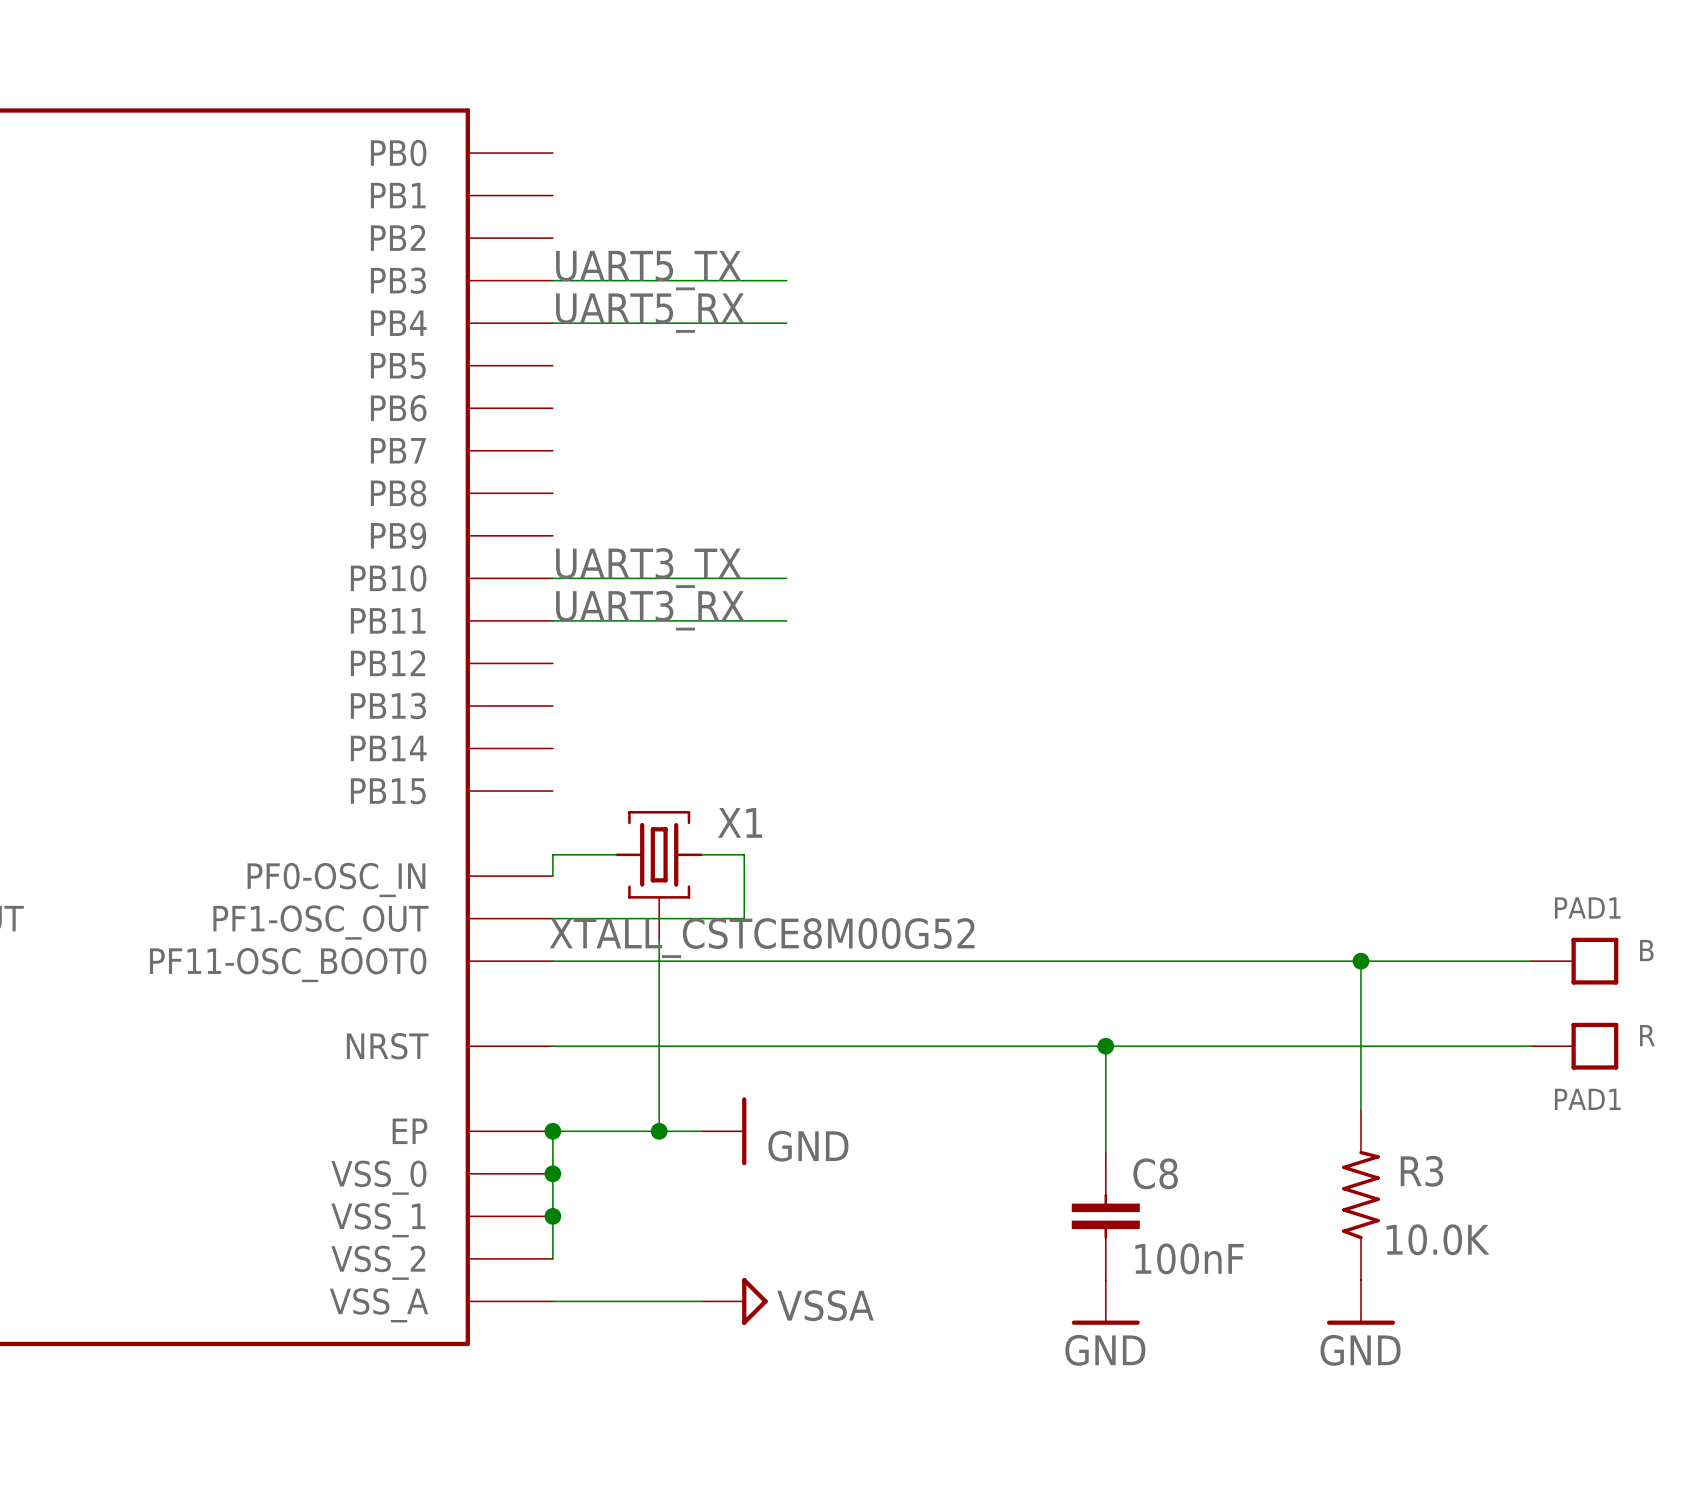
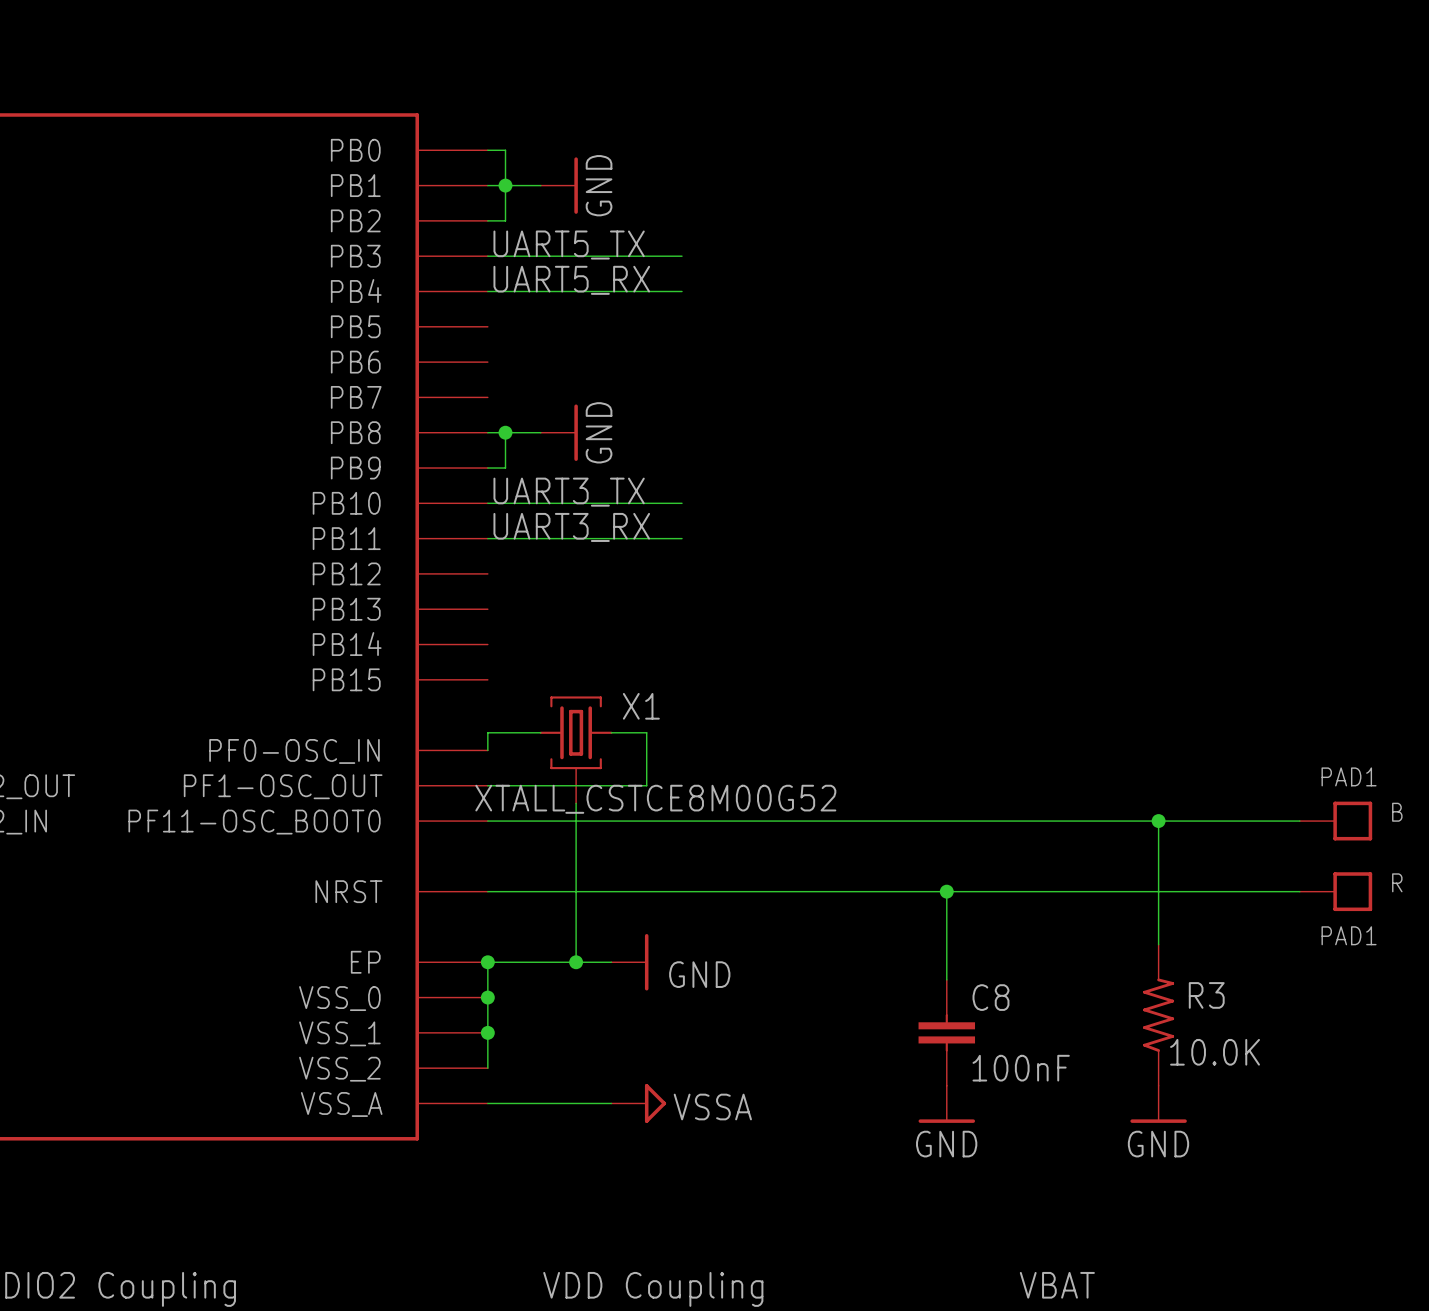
wire: none -> (487, 150) (505, 150) (505, 220) (487, 220)
wire: none -> (487, 185) (540, 185)
junction: none -> (505, 185)
power symbol: none -> GND (559, 185)
wire: none -> (487, 432) (540, 432)
wire: none -> (505, 432) (505, 468) (487, 468)
junction: none -> (505, 432)
power symbol: none -> GND (559, 432)

